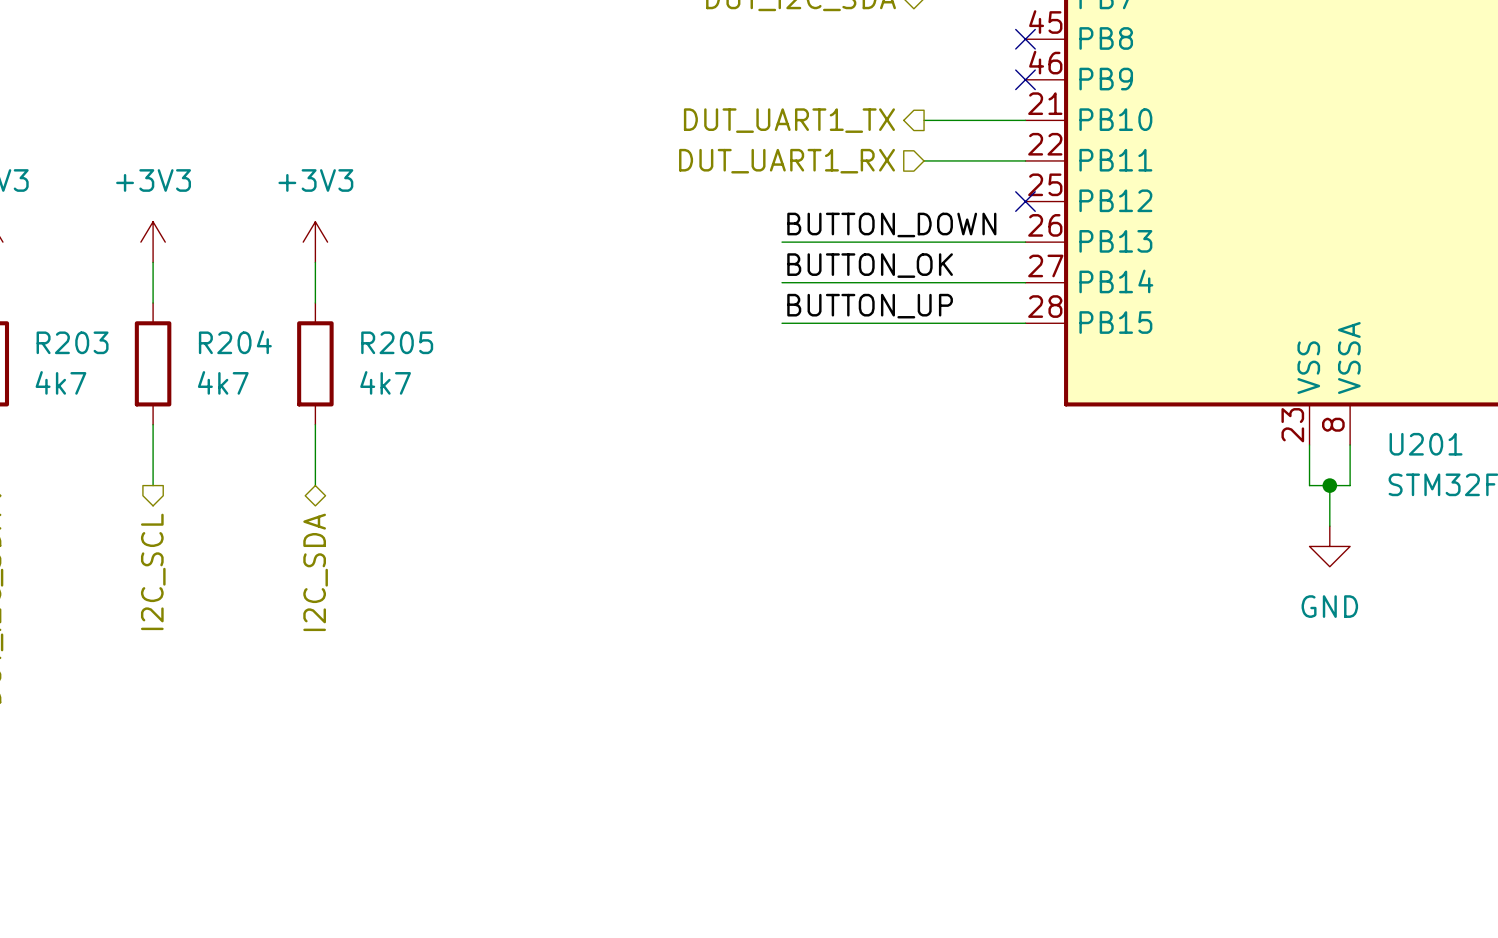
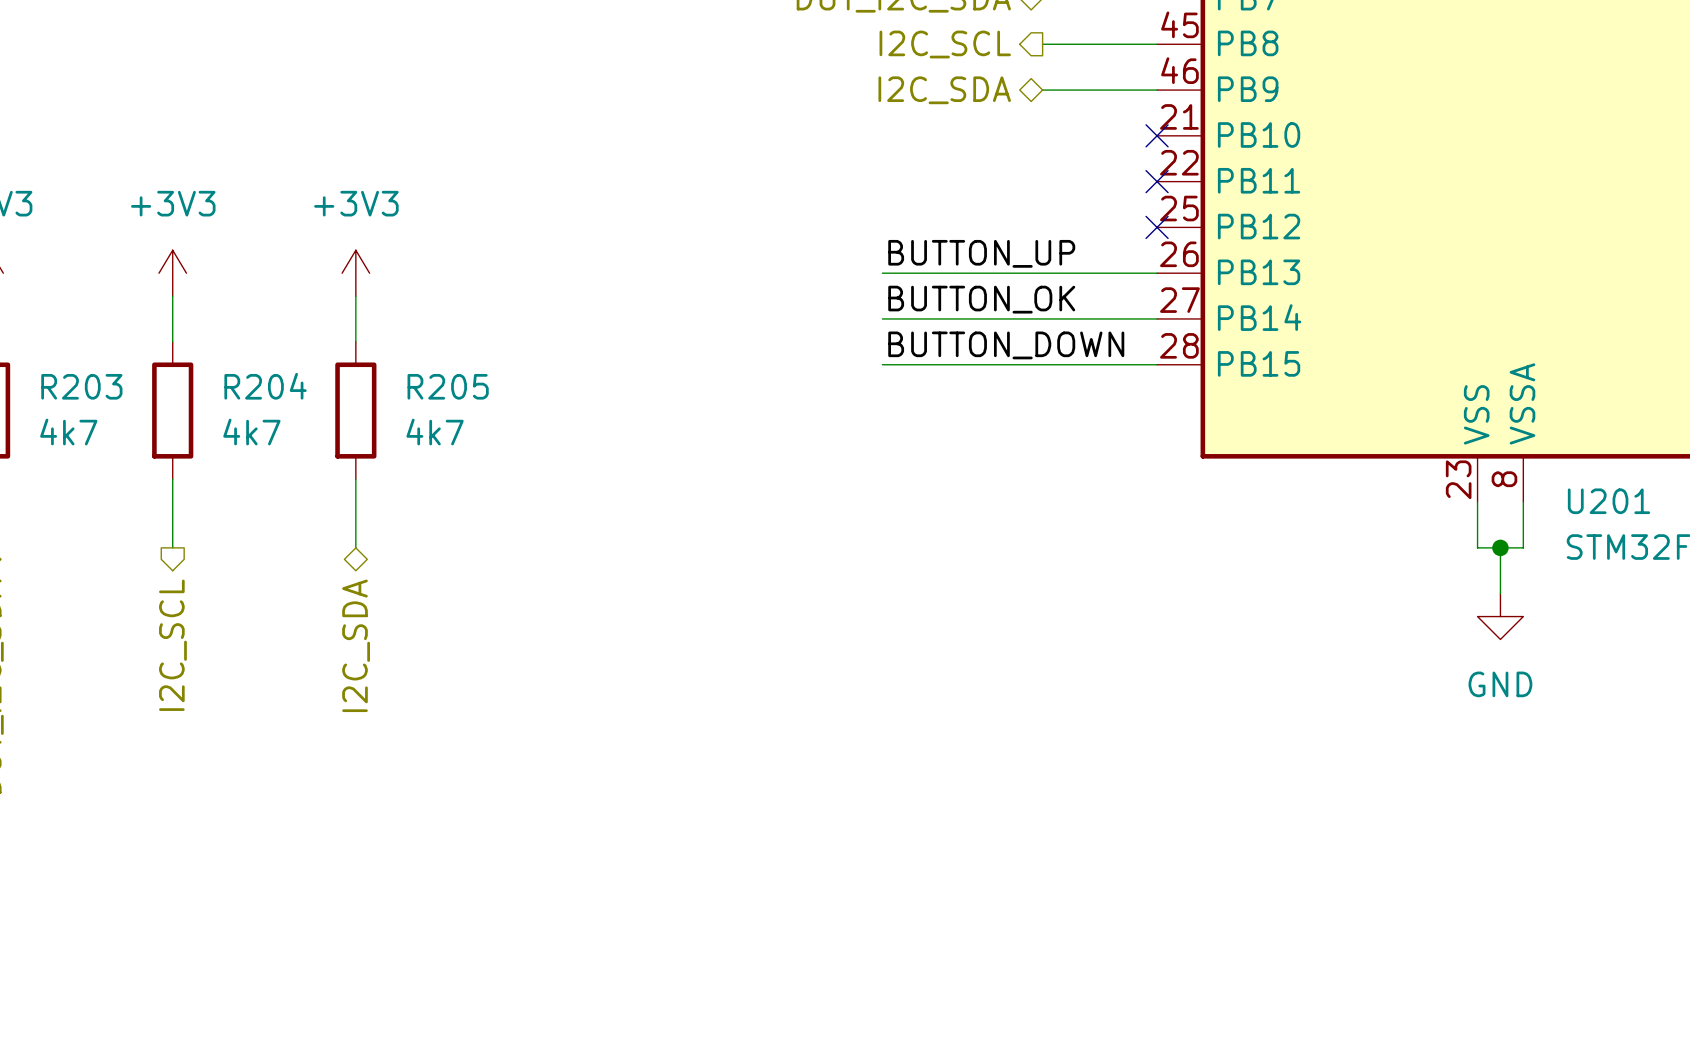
hierarchical label: none -> I2C_SCL (945, 44)
no-connect mark: (1025, 39) -> none
no-connect mark: (1025, 79) -> none
hierarchical label: none -> I2C_SDA (944, 90)
hierarchical label: DUT_UART1_TX (789, 120) -> none
wire: (924, 120) (1025, 120) -> (1042, 90) (1157, 90)
no-connect mark: none -> (1157, 135)
wire: (924, 160) (1025, 160) -> (1042, 44) (1157, 44)
no-connect mark: none -> (1157, 181)
hierarchical label: DUT_UART1_RX (787, 161) -> none
label: BUTTON_DOWN (891, 224) -> BUTTON_UP (981, 253)
label: BUTTON_UP (870, 306) -> BUTTON_DOWN (1006, 345)

